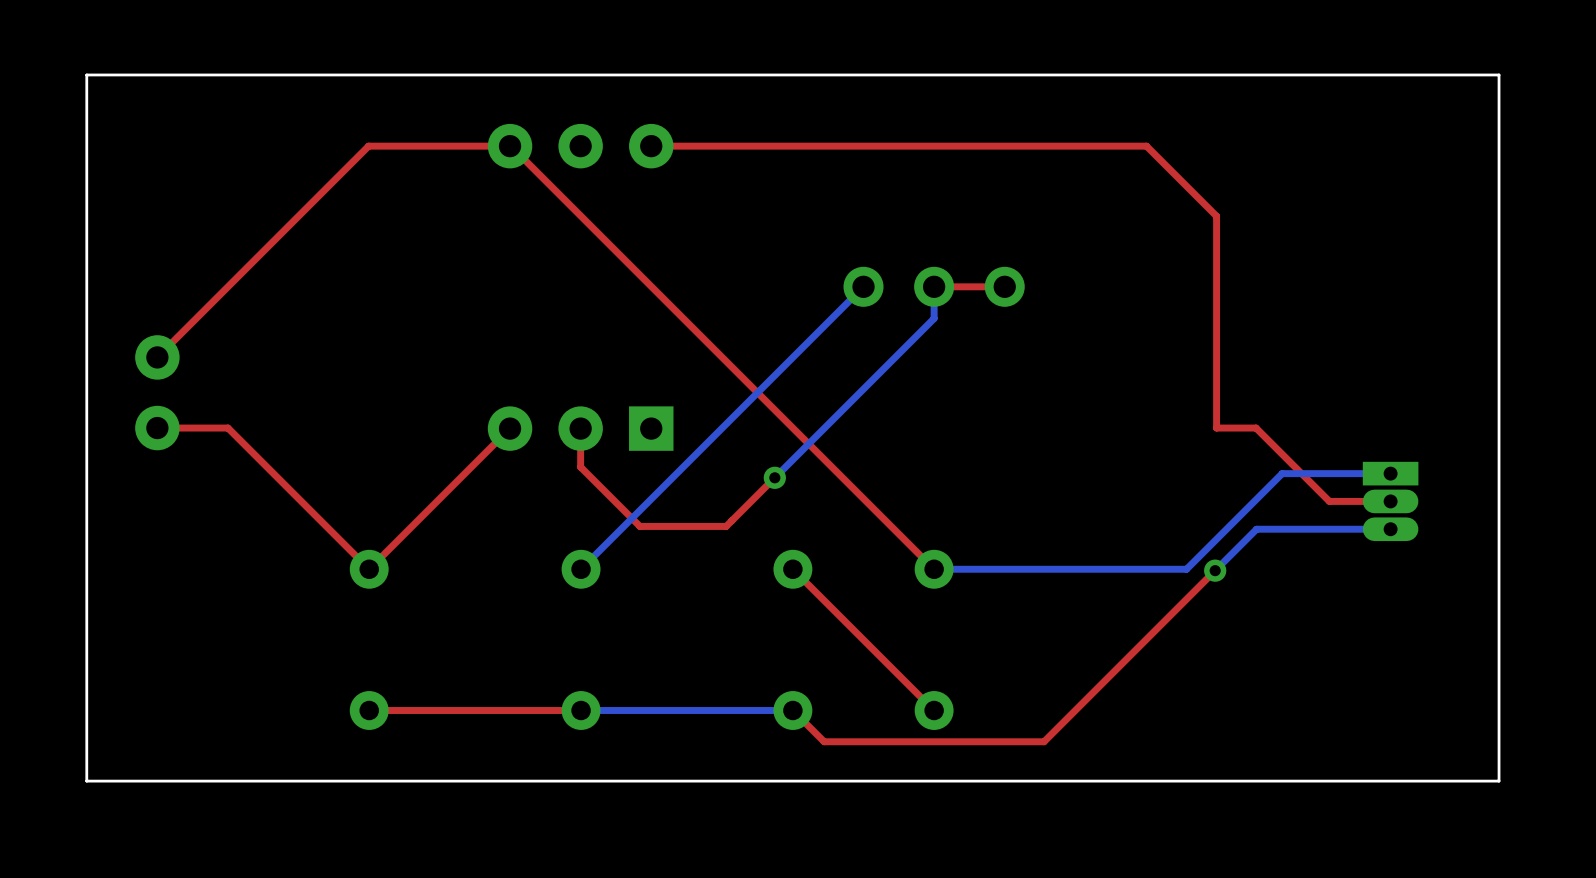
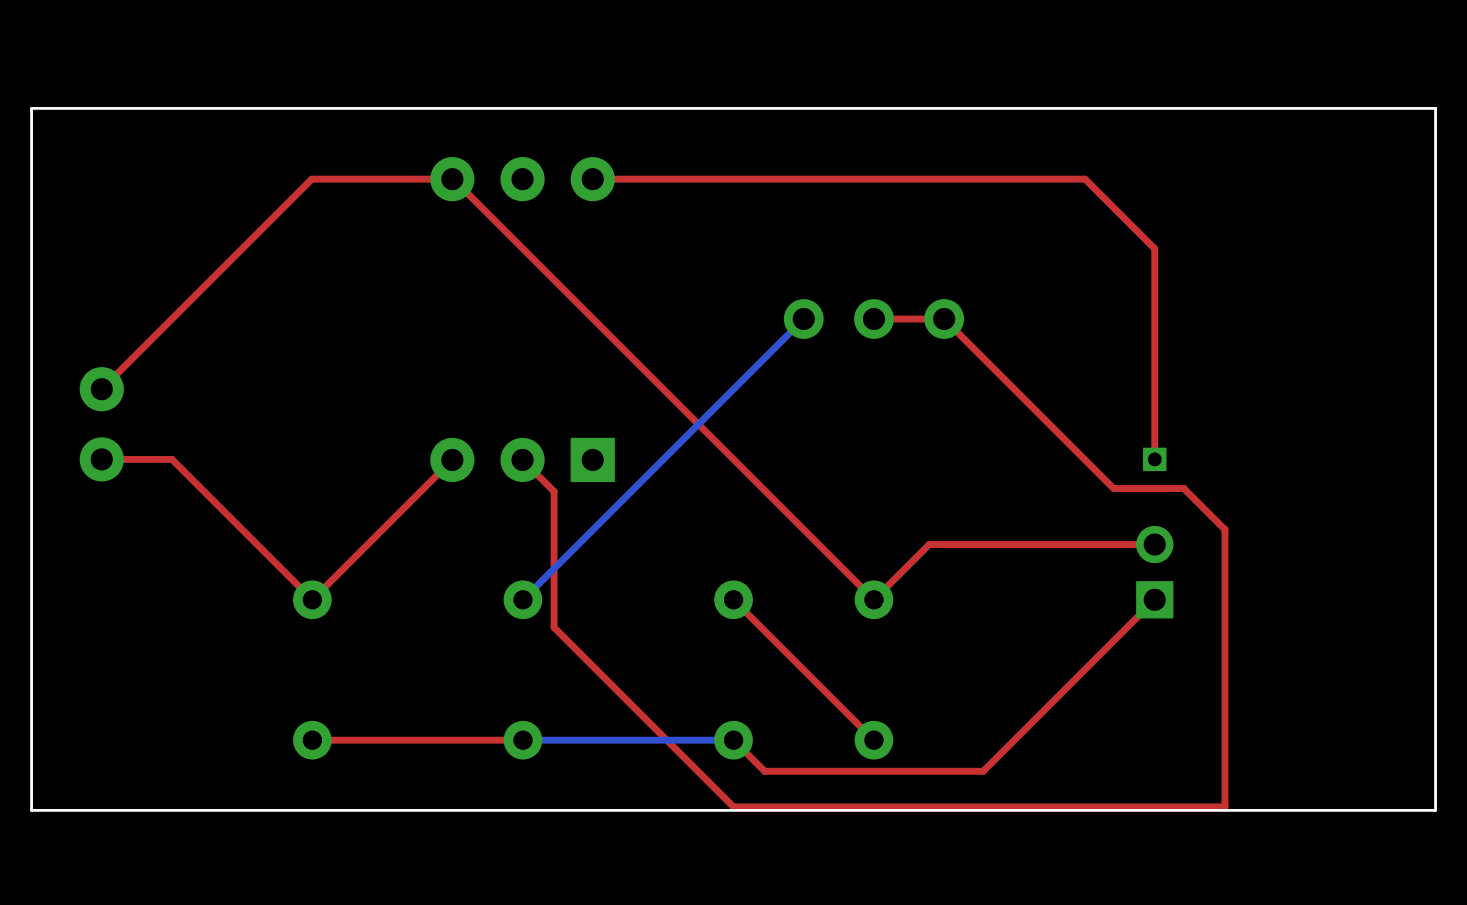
bottom track: (934, 286) (934, 318) (774, 477) -> none
top track: (580, 428) (580, 467) (640, 526) (726, 526) (776, 476) (776, 473) -> (522, 459) (554, 491) (554, 627) (733, 806) (1224, 806) (1224, 529) (1183, 488) (1113, 488) (944, 319)
top track: (1216, 428) (1256, 428) (1329, 501) (1390, 501) -> none
part: none -> (1154, 459)
bottom track: (1390, 473) (1282, 473) (1186, 569) (934, 569) -> none
via: (774, 477) -> none
part: (1390, 501) -> none
top track: none -> (1154, 544) (929, 544) (873, 599)
bottom track: (1390, 529) (1256, 529) (1215, 570) -> none
part: none -> (1154, 572)
via: (1215, 570) -> none

